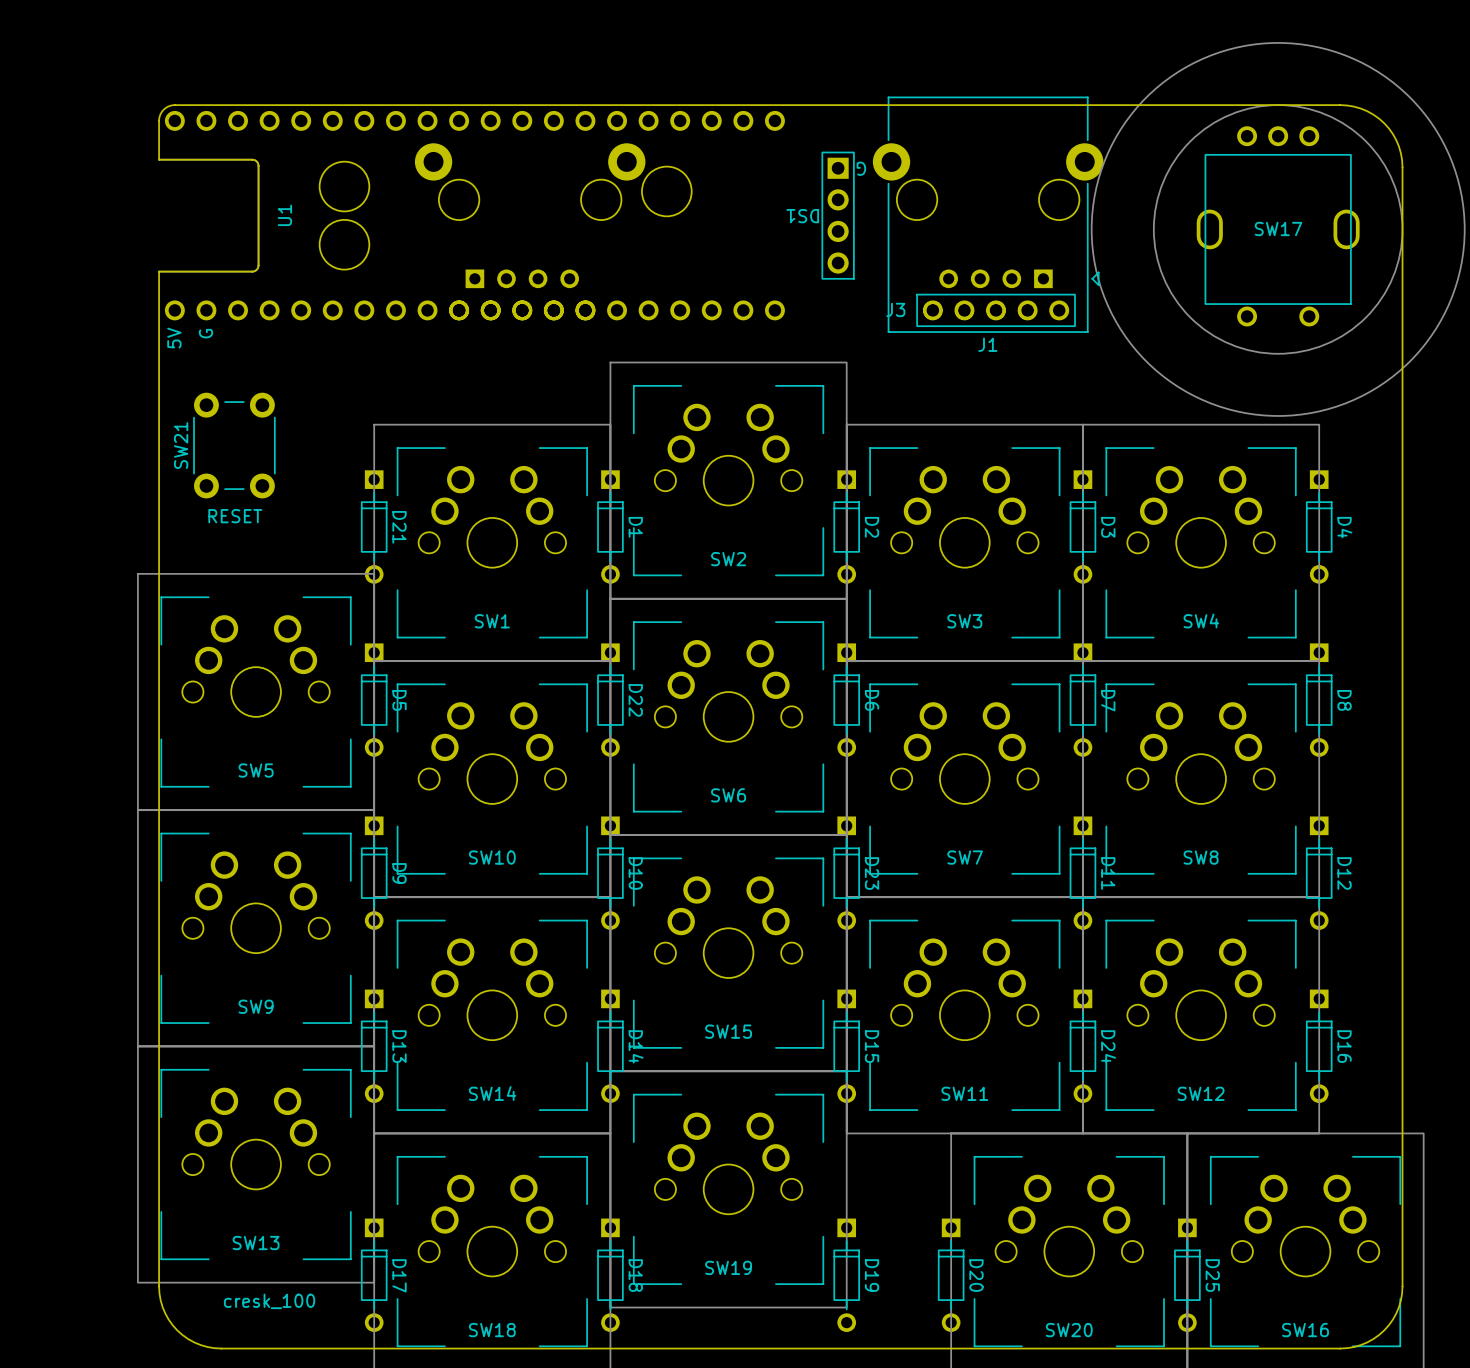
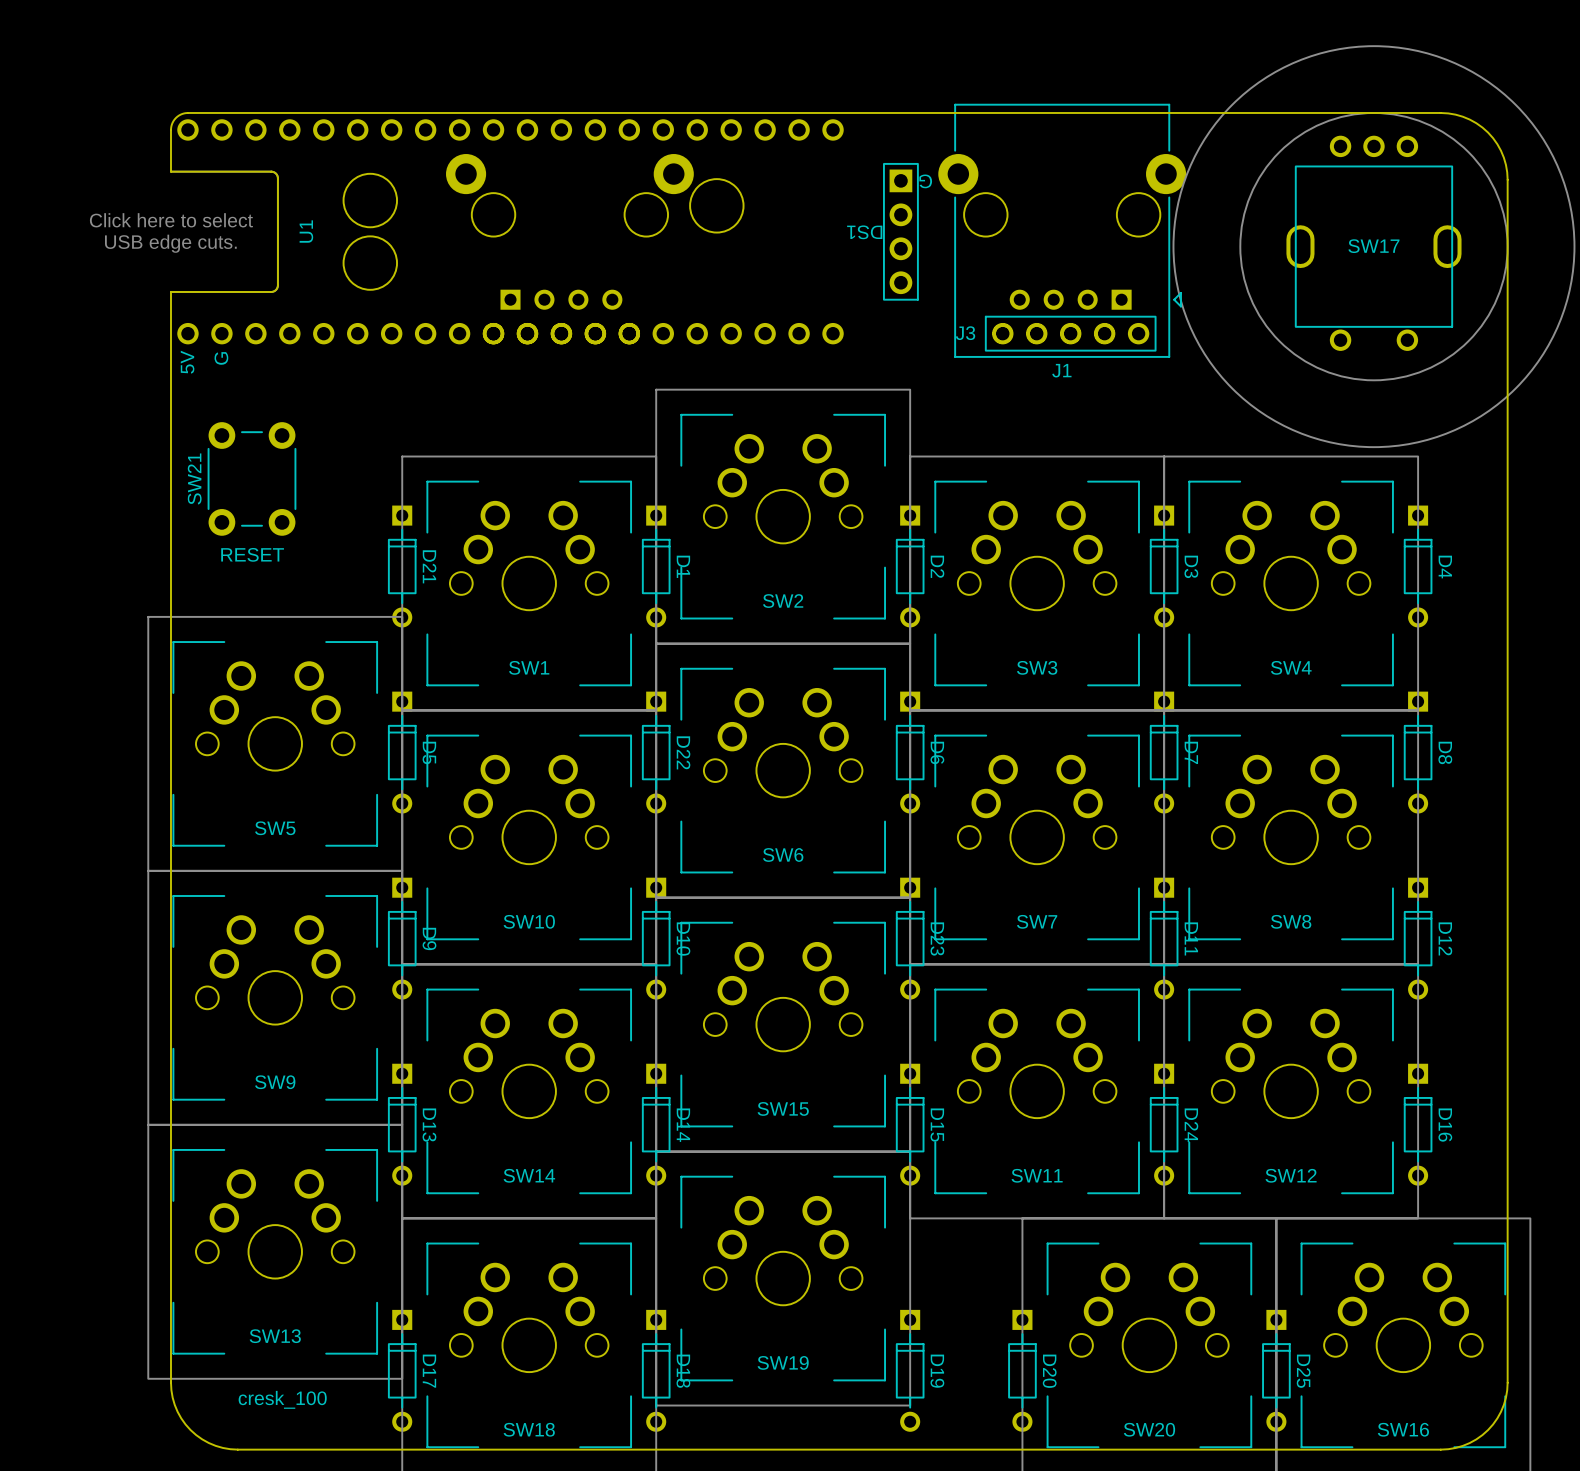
text: none -> Click here to select (171, 220)
text: none -> USB edge cuts. (170, 243)

